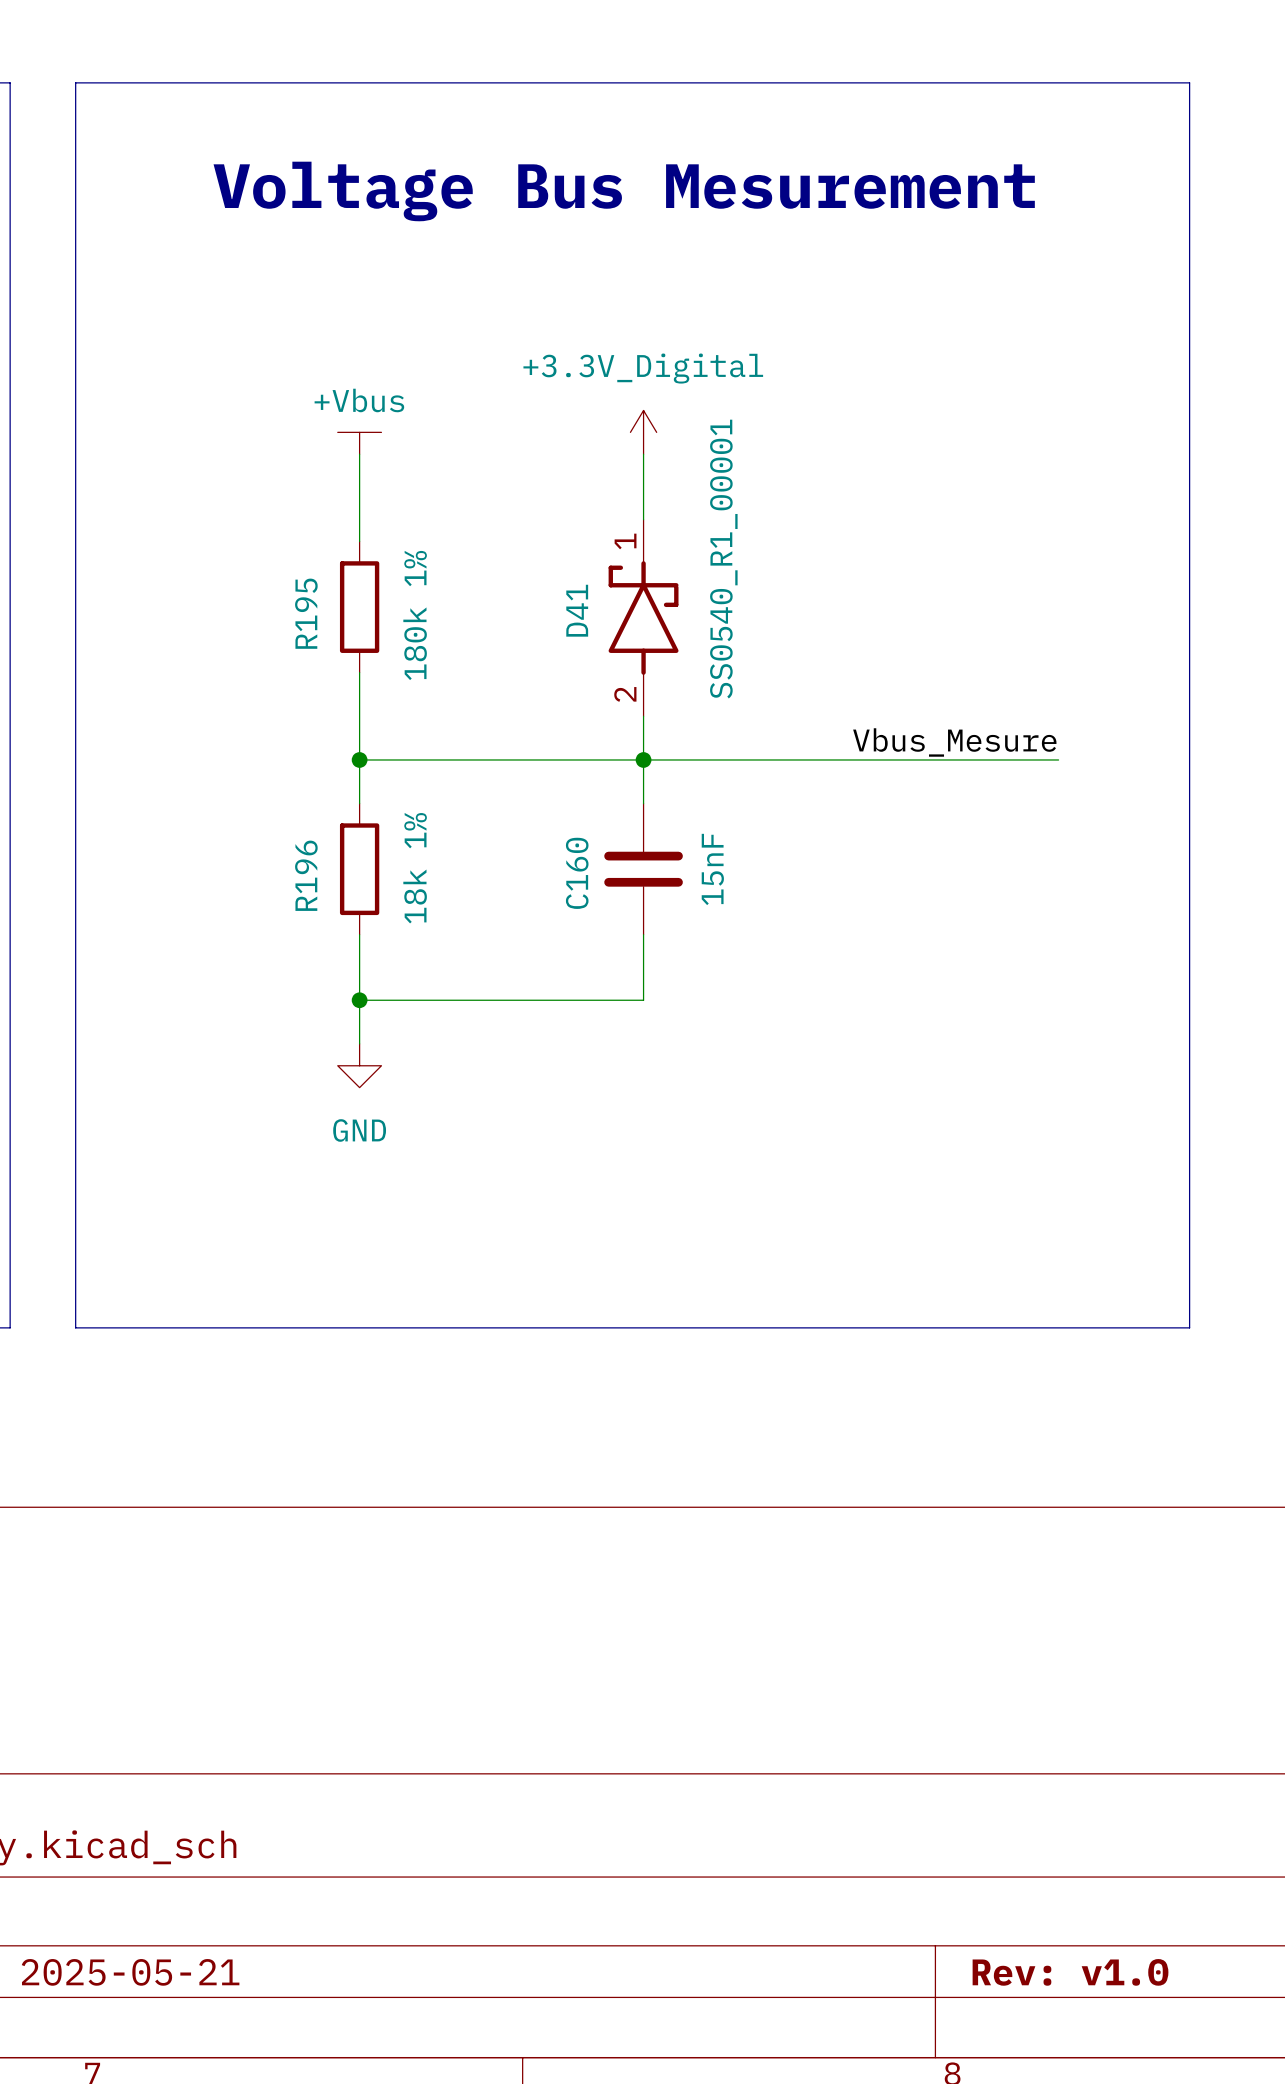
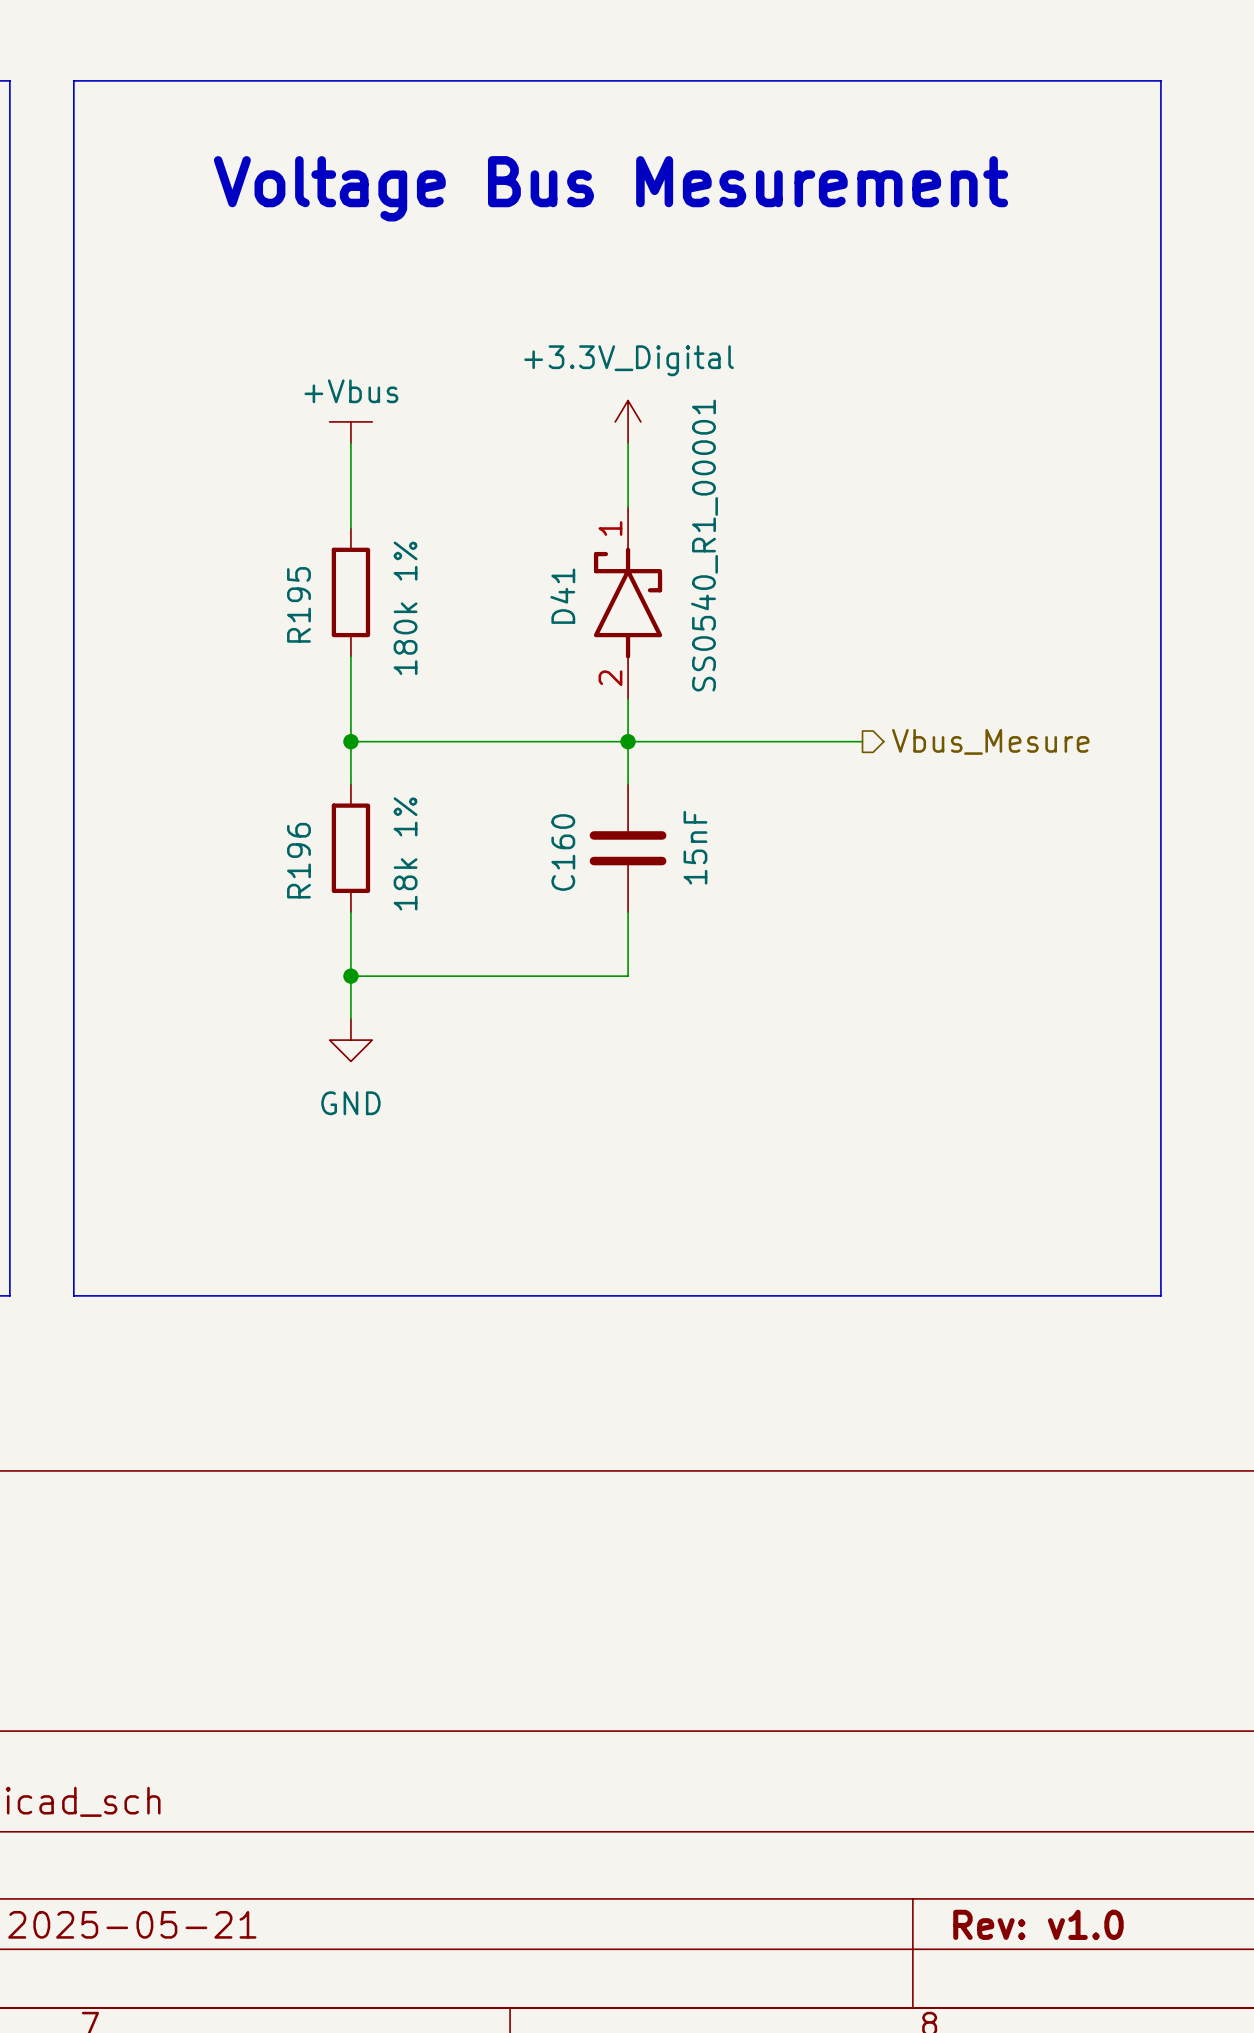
label: Vbus_Mesure (954, 742) -> none
wire: (883, 759) (1058, 759) -> none
hierarchical label: none -> Vbus_Mesure (990, 741)

